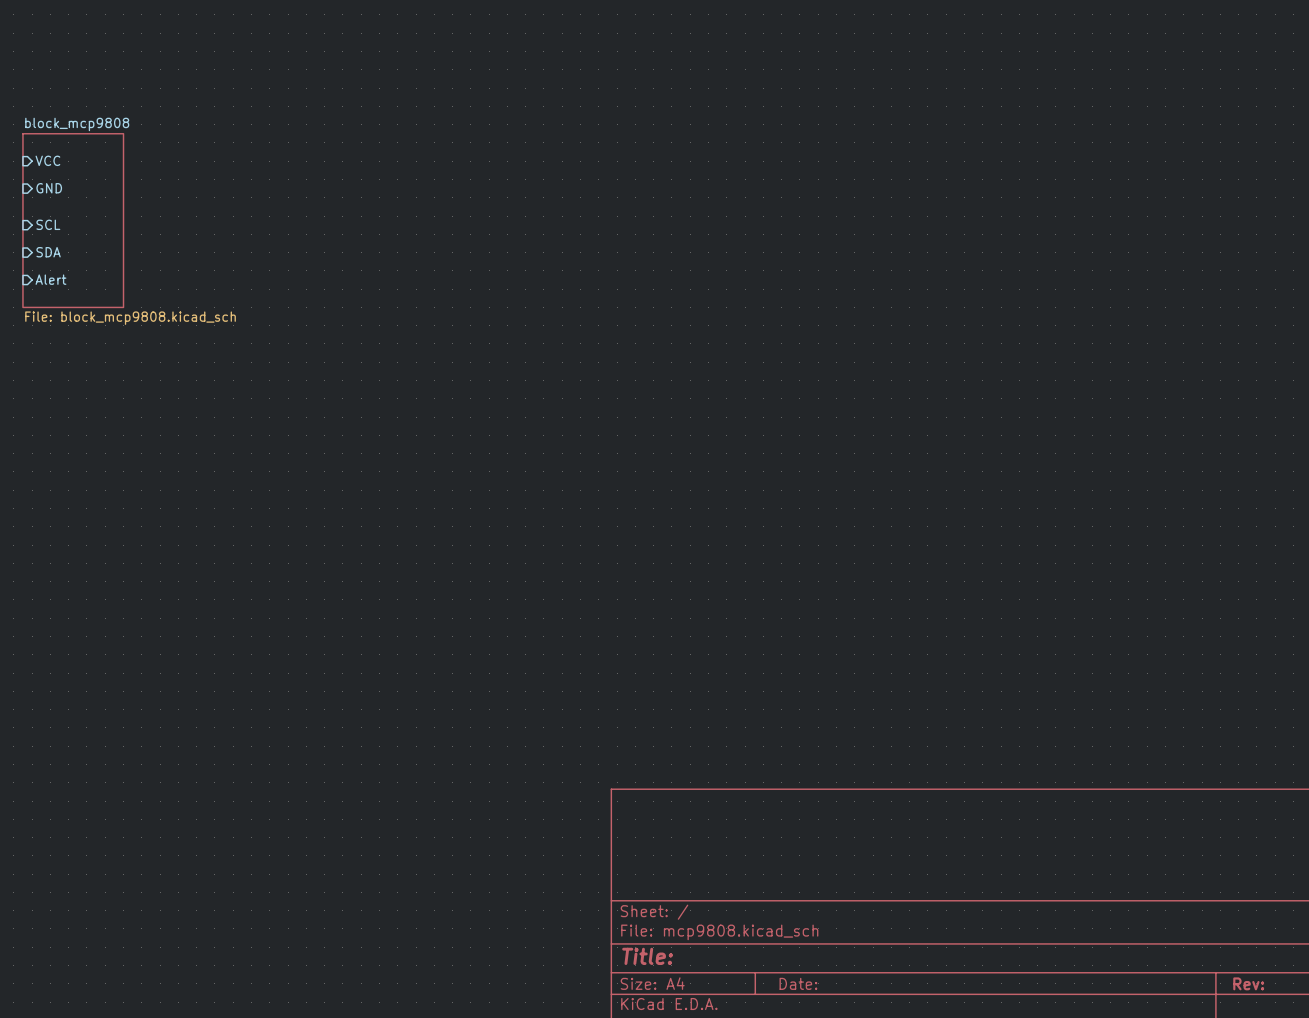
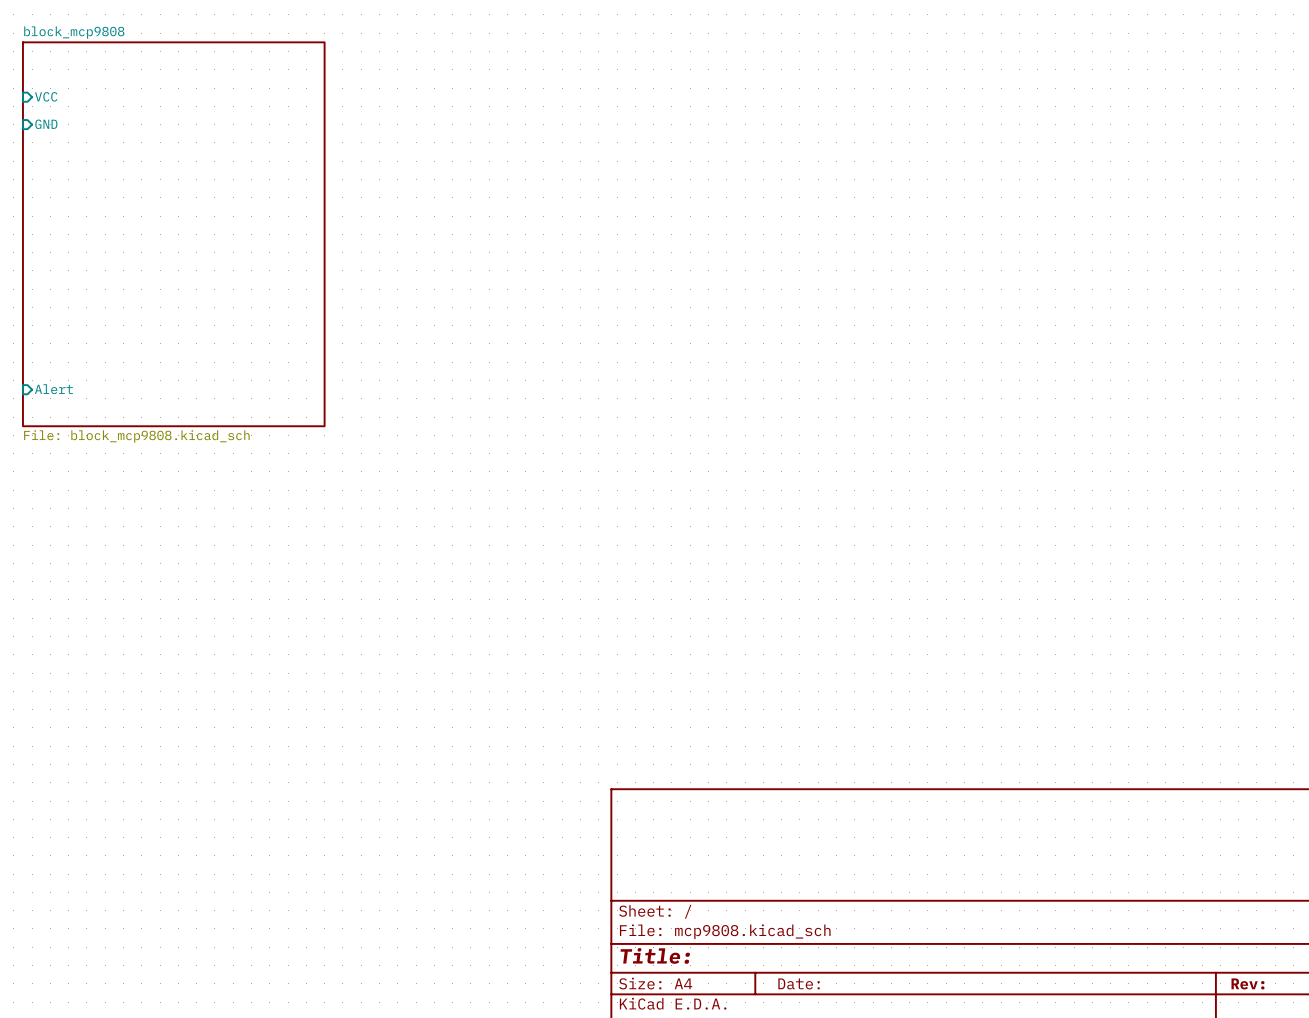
sheet block_mcp9808 name position: block_mcp9808 (77, 124) -> block_mcp9808 (74, 32)
sheet block_mcp9808 shape: [22, 133, 125, 308] -> [22, 41, 326, 427]
sheet pin position: VCC (47, 160) -> VCC (46, 96)
sheet pin position: GND (49, 188) -> GND (46, 124)
sheet pin: SCL (48, 224) -> none
sheet pin: SDA (48, 252) -> none
sheet pin position: Alert (50, 279) -> Alert (53, 389)
sheet block_mcp9808 value position: File: block_mcp9808.kicad_sch (130, 318) -> File: block_mcp9808.kicad_sch (136, 436)

